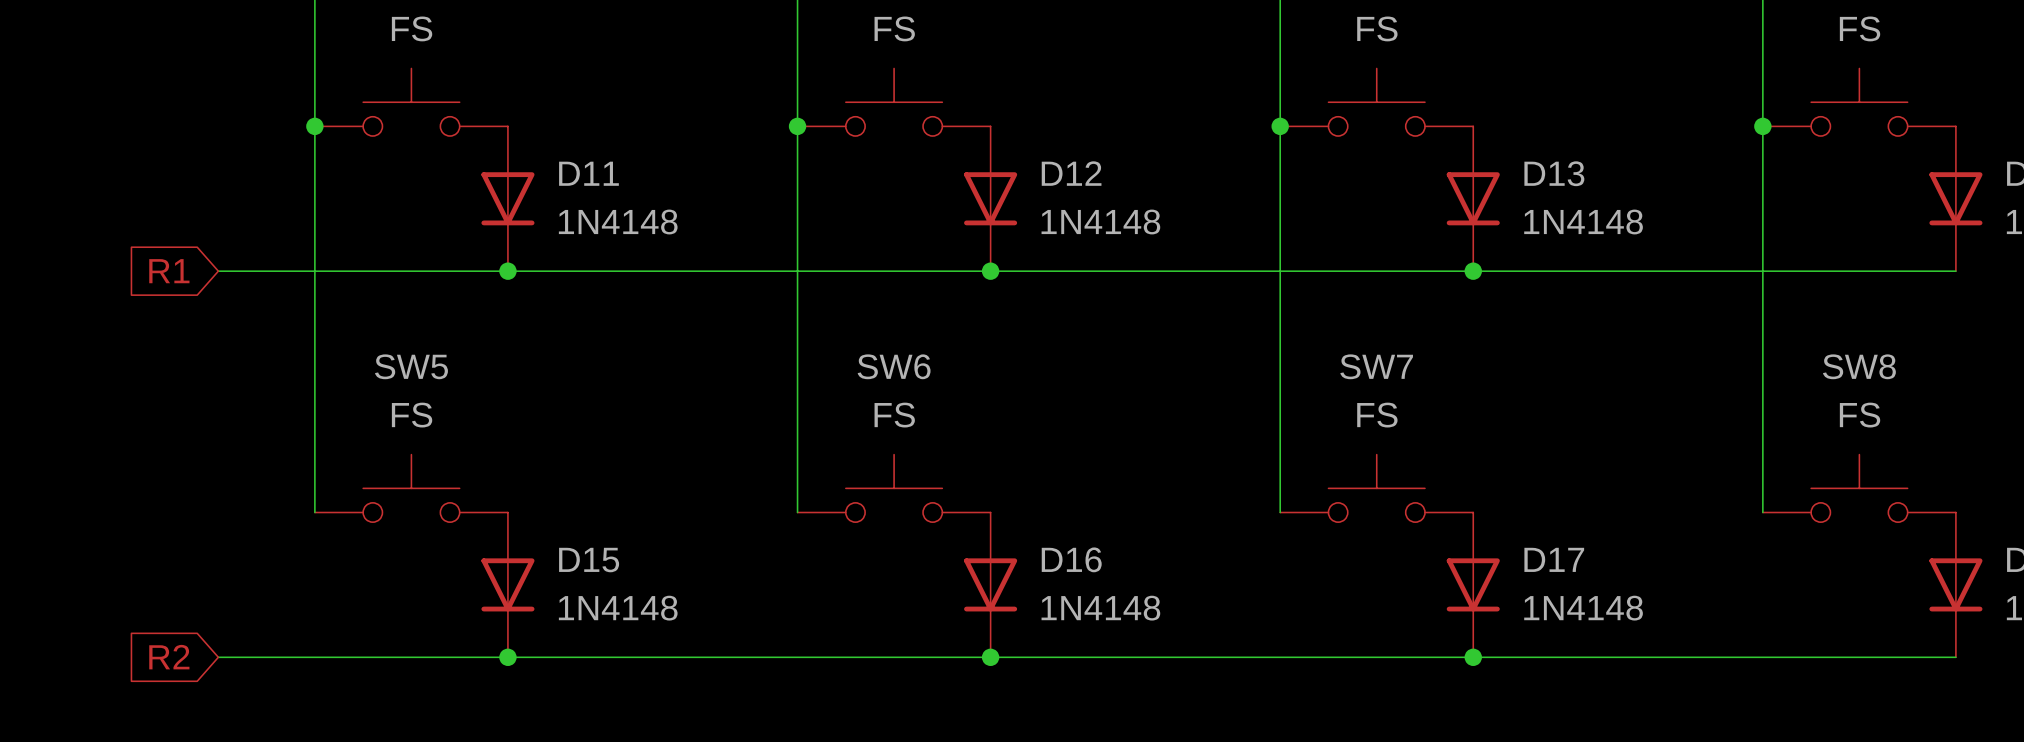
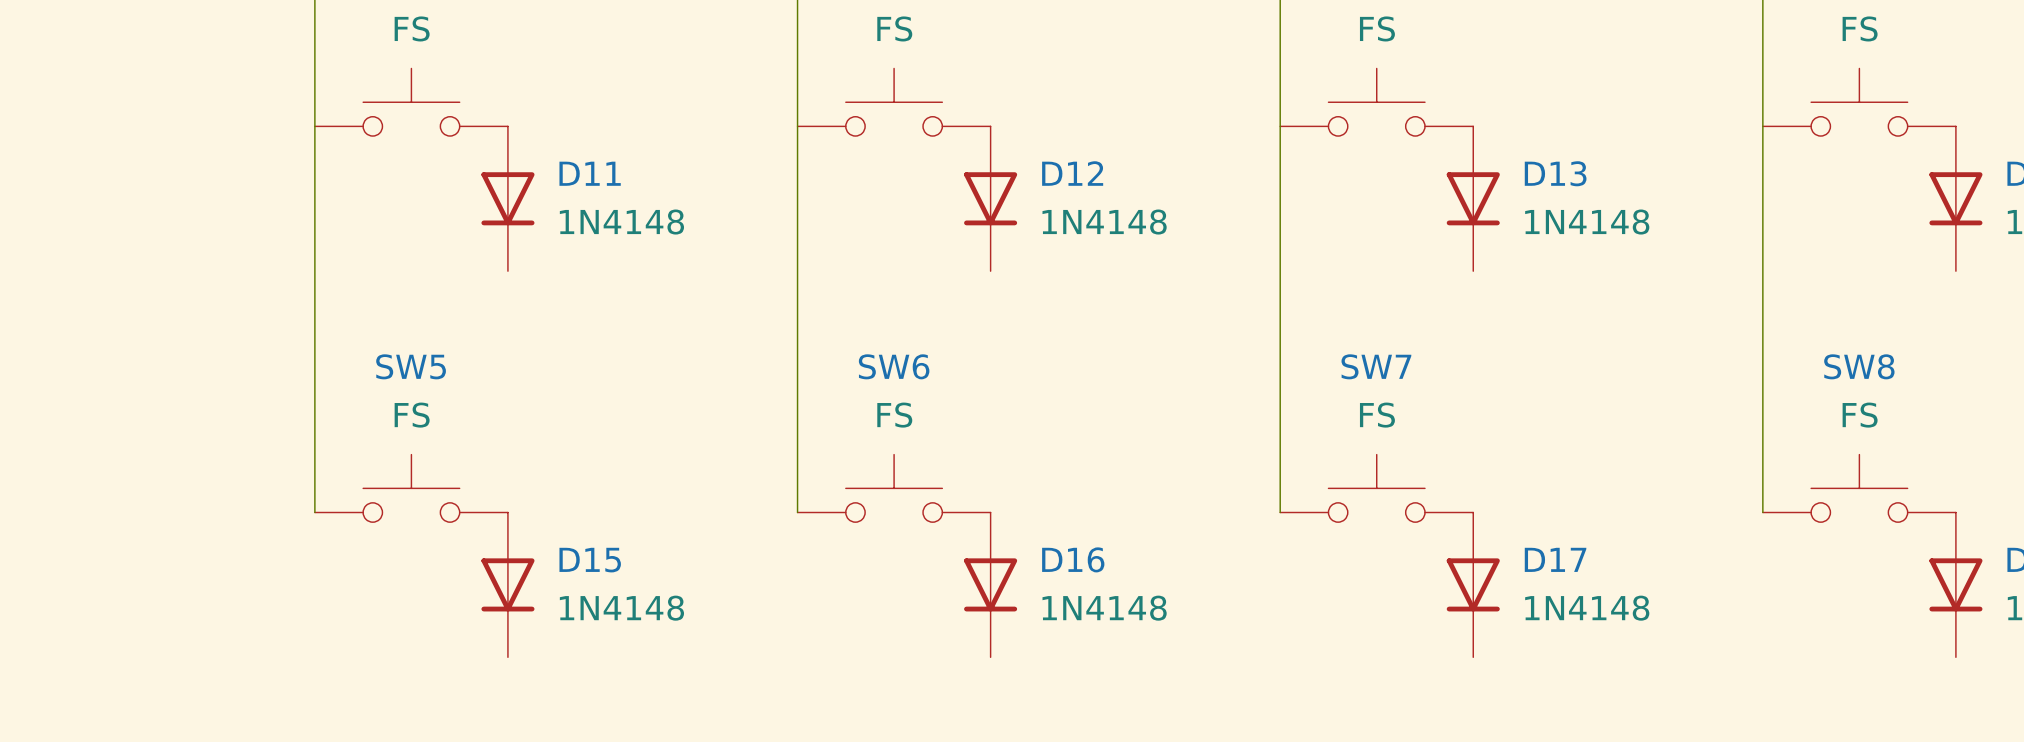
junction: (314, 126) -> none
junction: (797, 126) -> none
junction: (1280, 126) -> none
junction: (1762, 126) -> none
global label: R1 (169, 271) -> none
wire: (218, 271) (1955, 271) -> none
junction: (507, 271) -> none
junction: (990, 271) -> none
junction: (1473, 271) -> none
global label: R2 (169, 657) -> none
wire: (218, 657) (1955, 657) -> none
junction: (507, 657) -> none
junction: (990, 657) -> none
junction: (1473, 657) -> none

